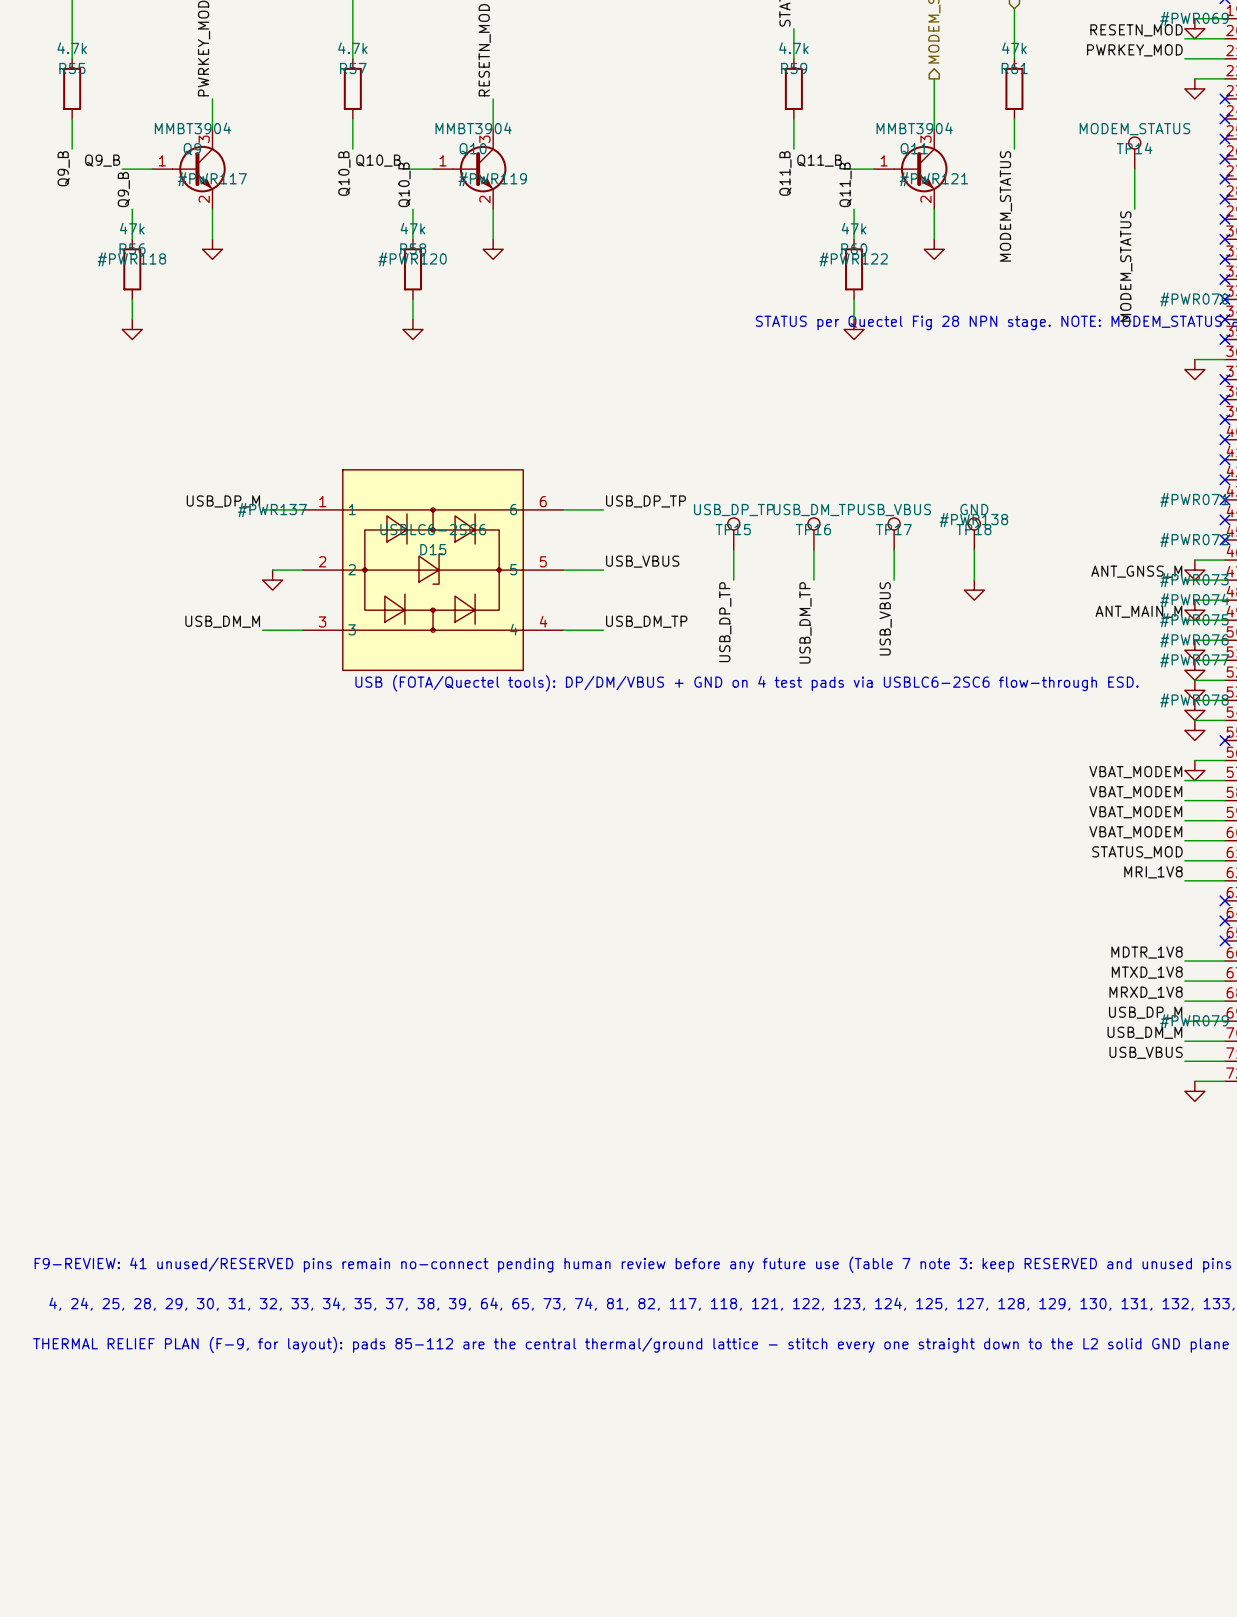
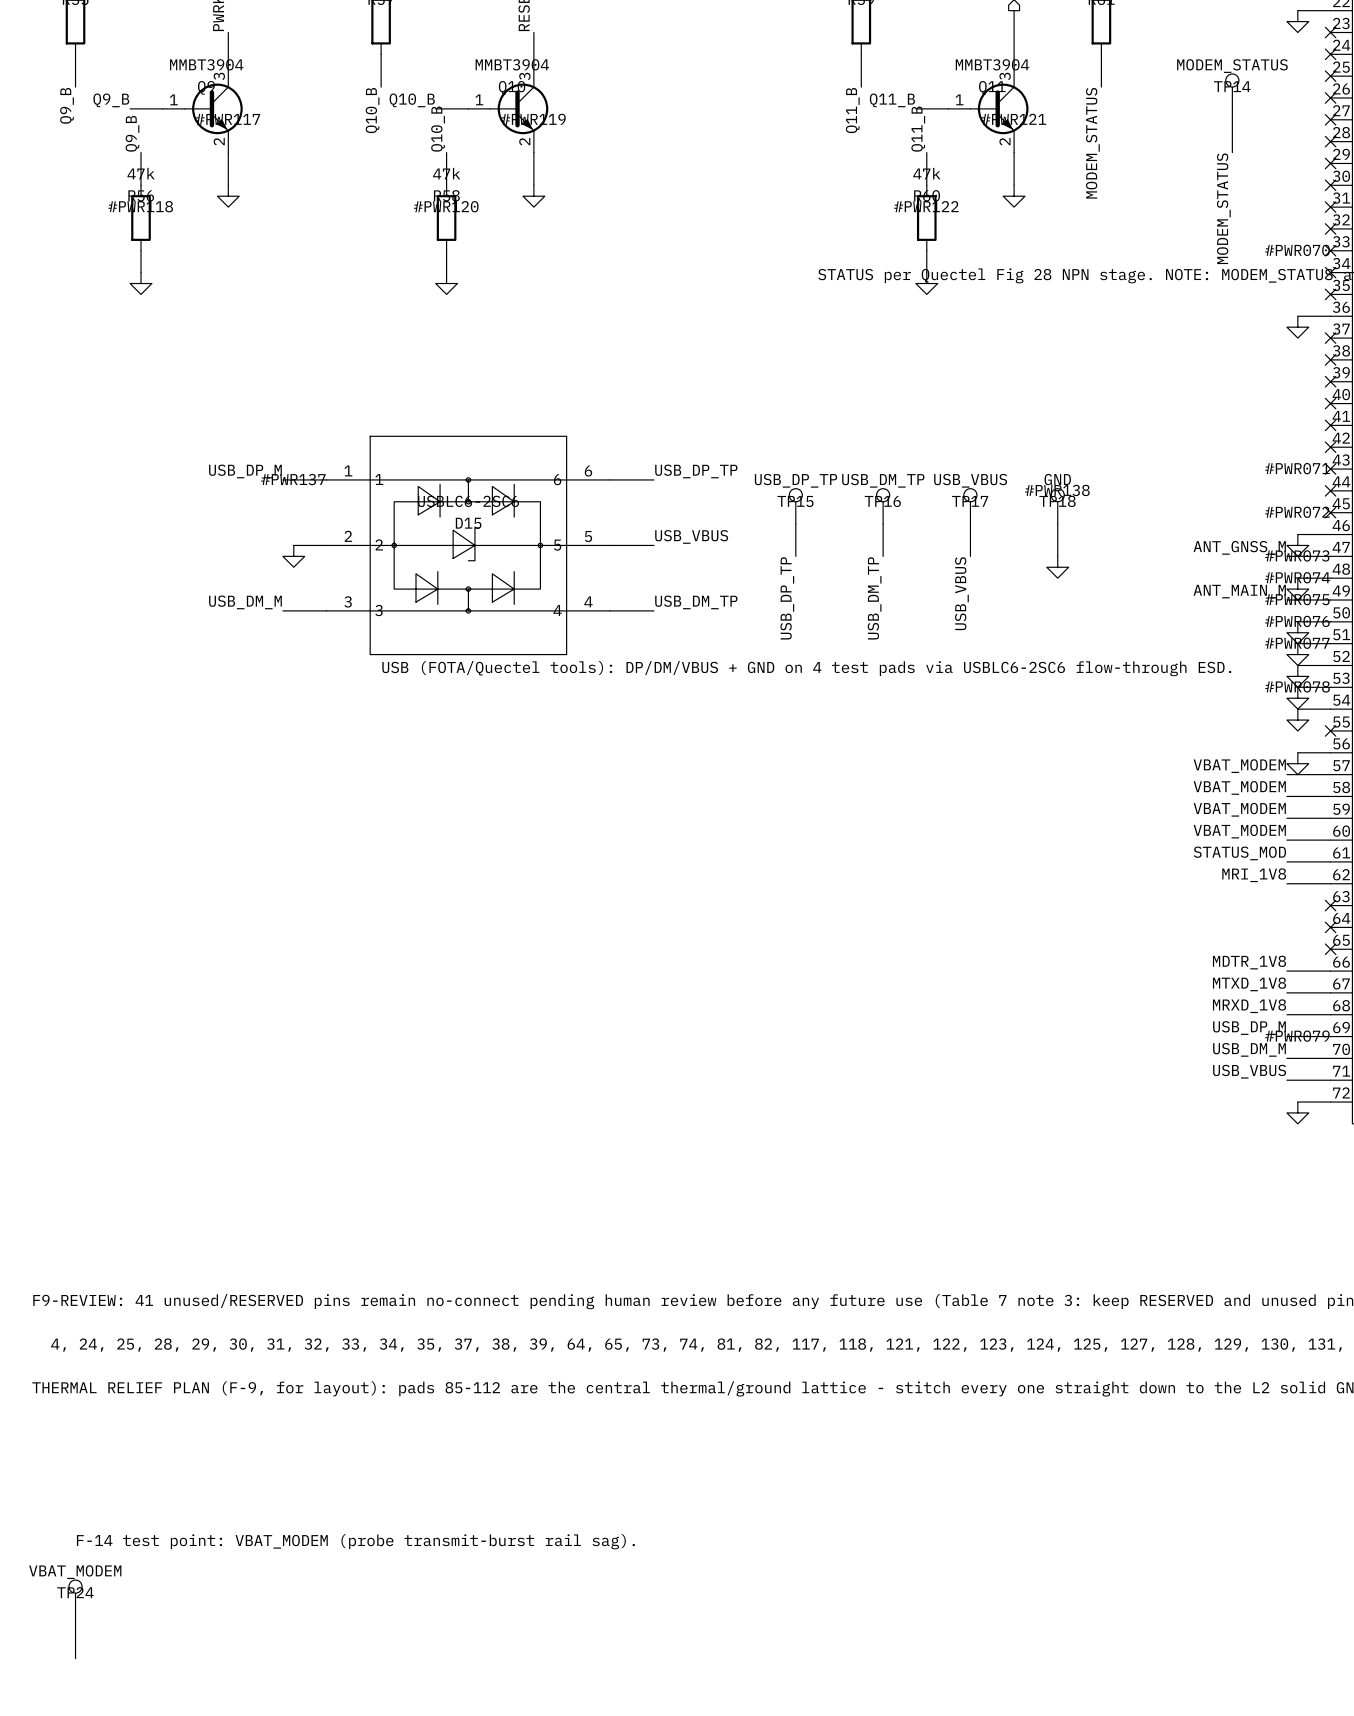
text: none -> F-14 test point: VBAT_MODEM (probe transmit-burst rail sag). (355, 1541)
TP24: none -> VBAT_MODEM (75, 1597)
wire: none -> (75, 1614) (75, 1658)

